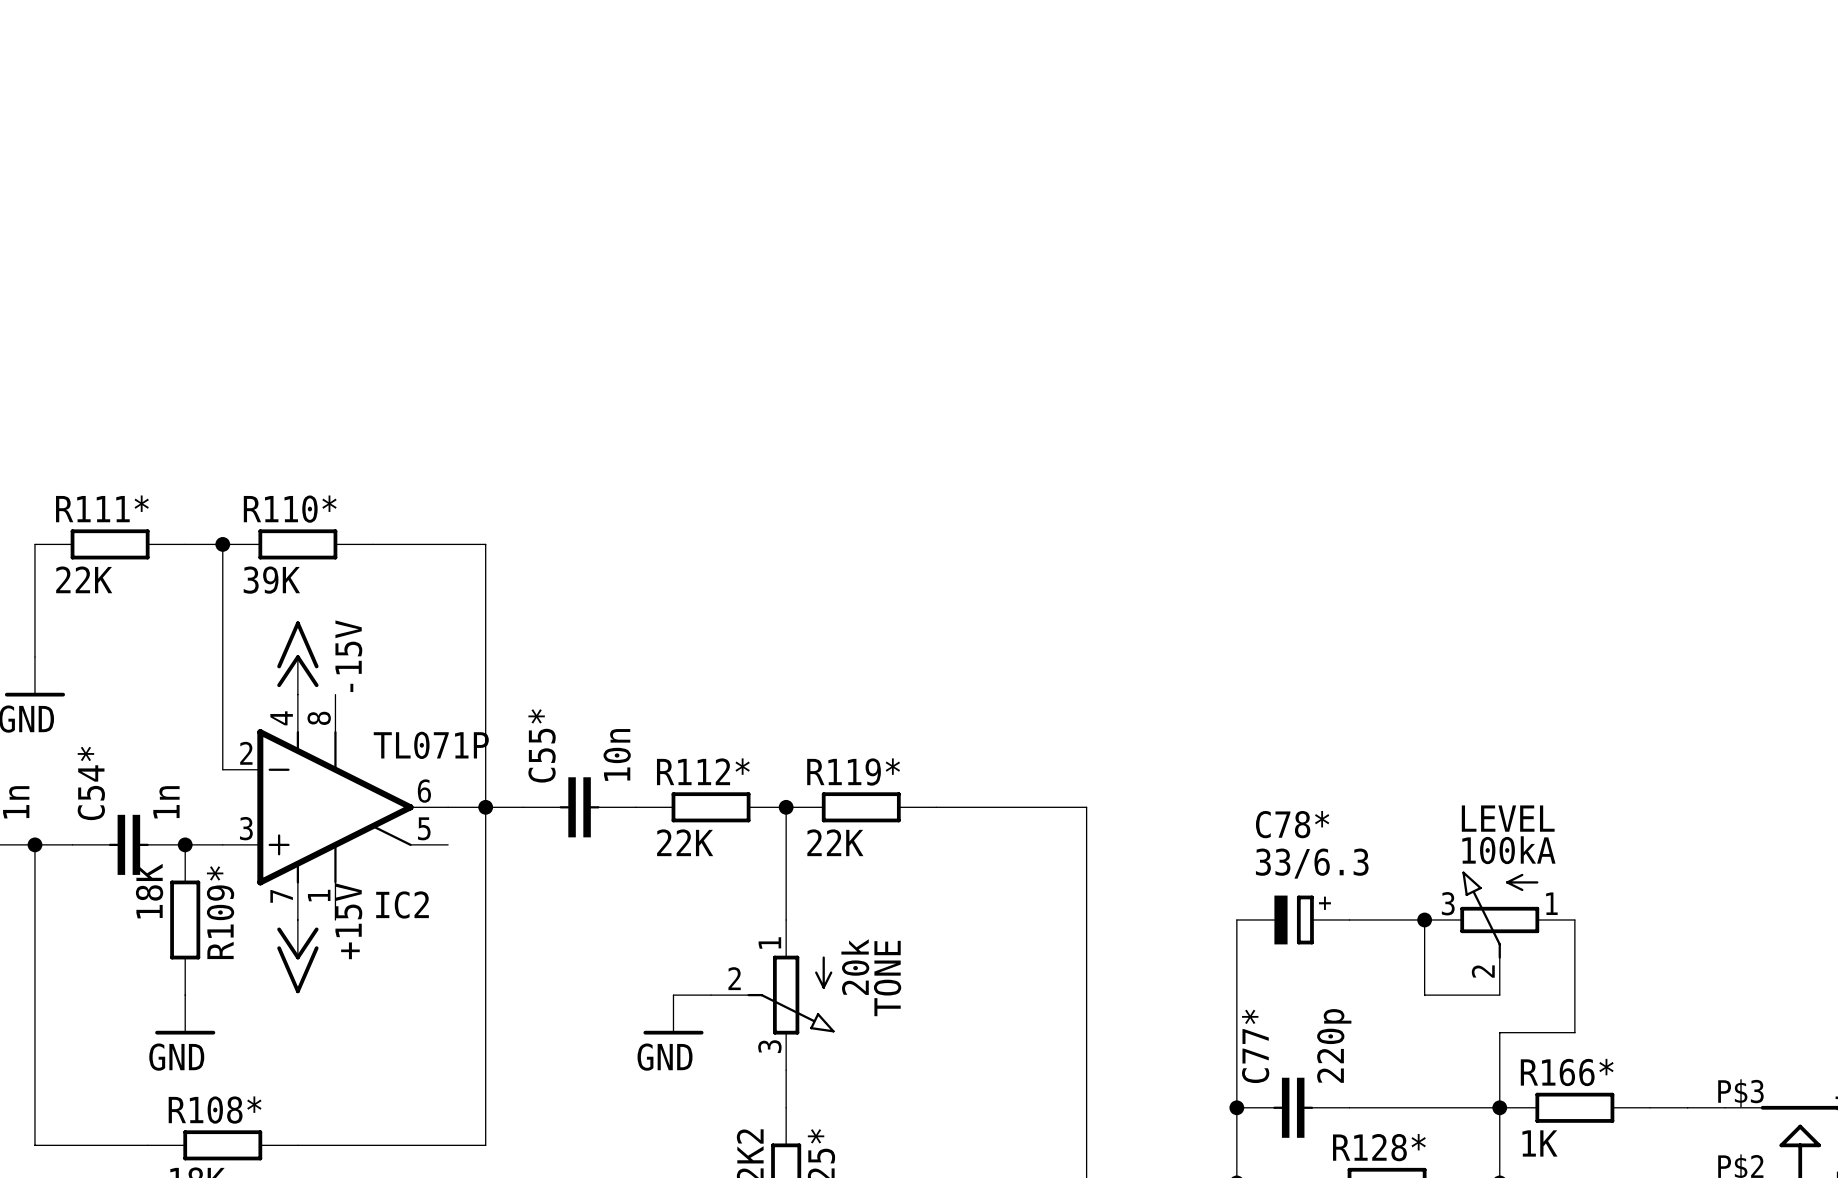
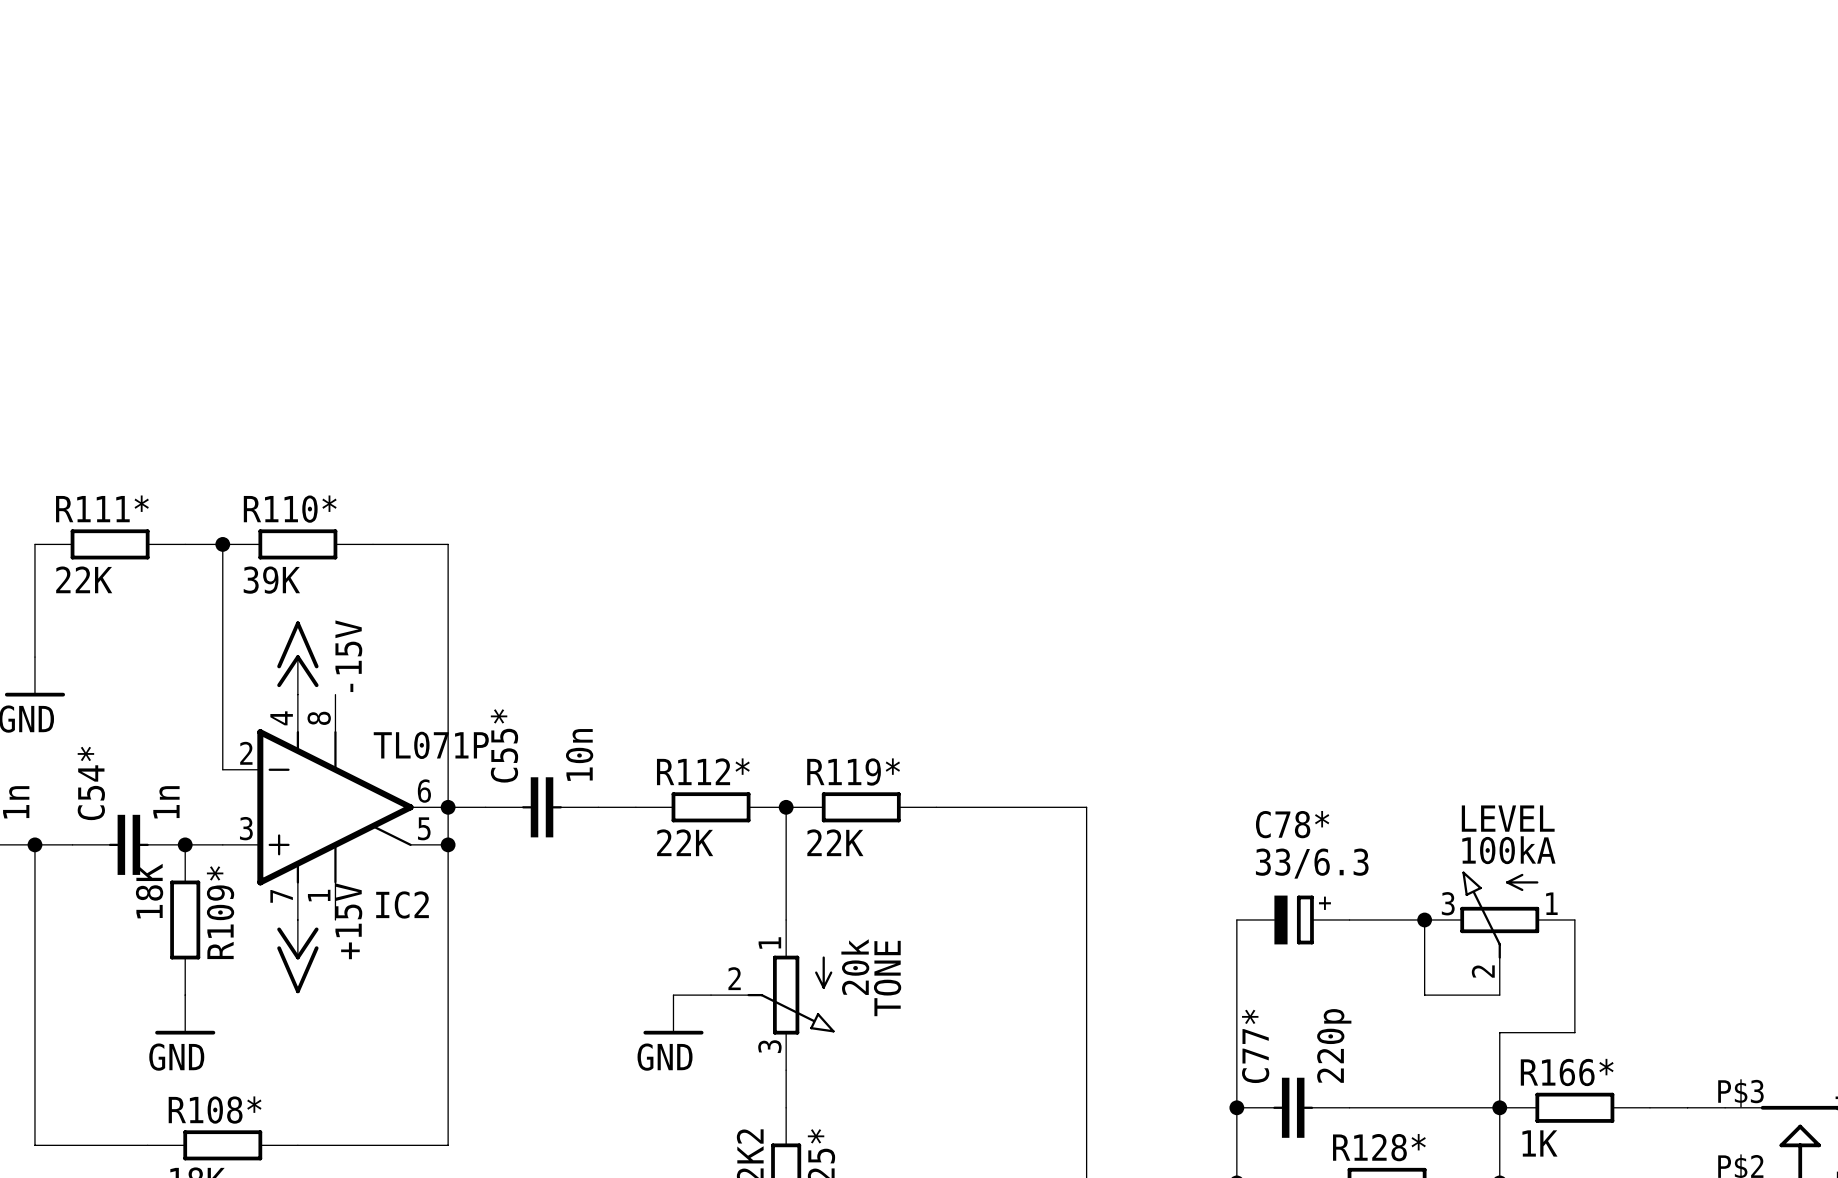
wire: (448, 544) (485, 544) (485, 1145) (448, 1145) -> (448, 544) (448, 1145)
junction: none -> (448, 807)
junction: (485, 807) -> none
C55* position: (579, 807) -> (542, 807)
junction: none -> (448, 844)

